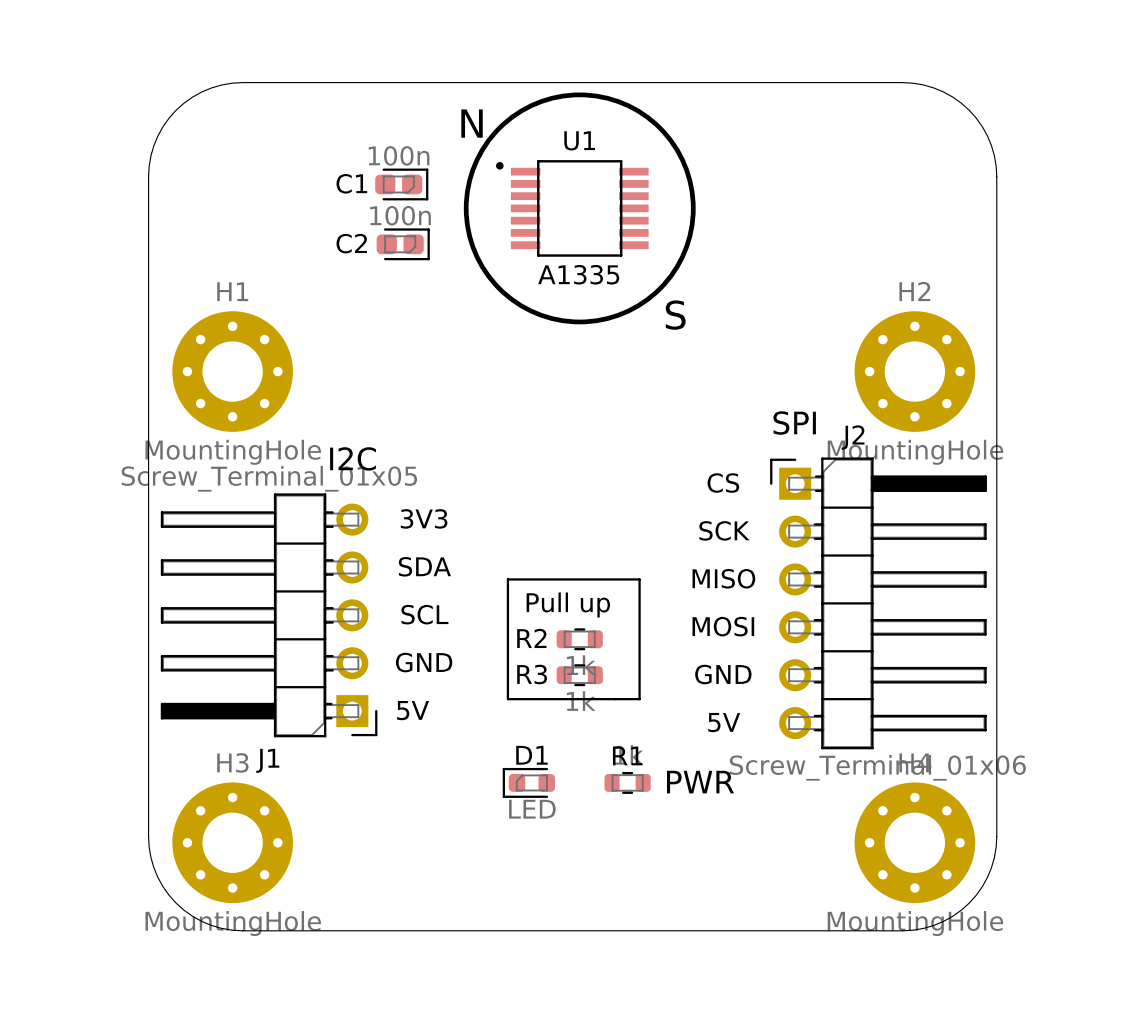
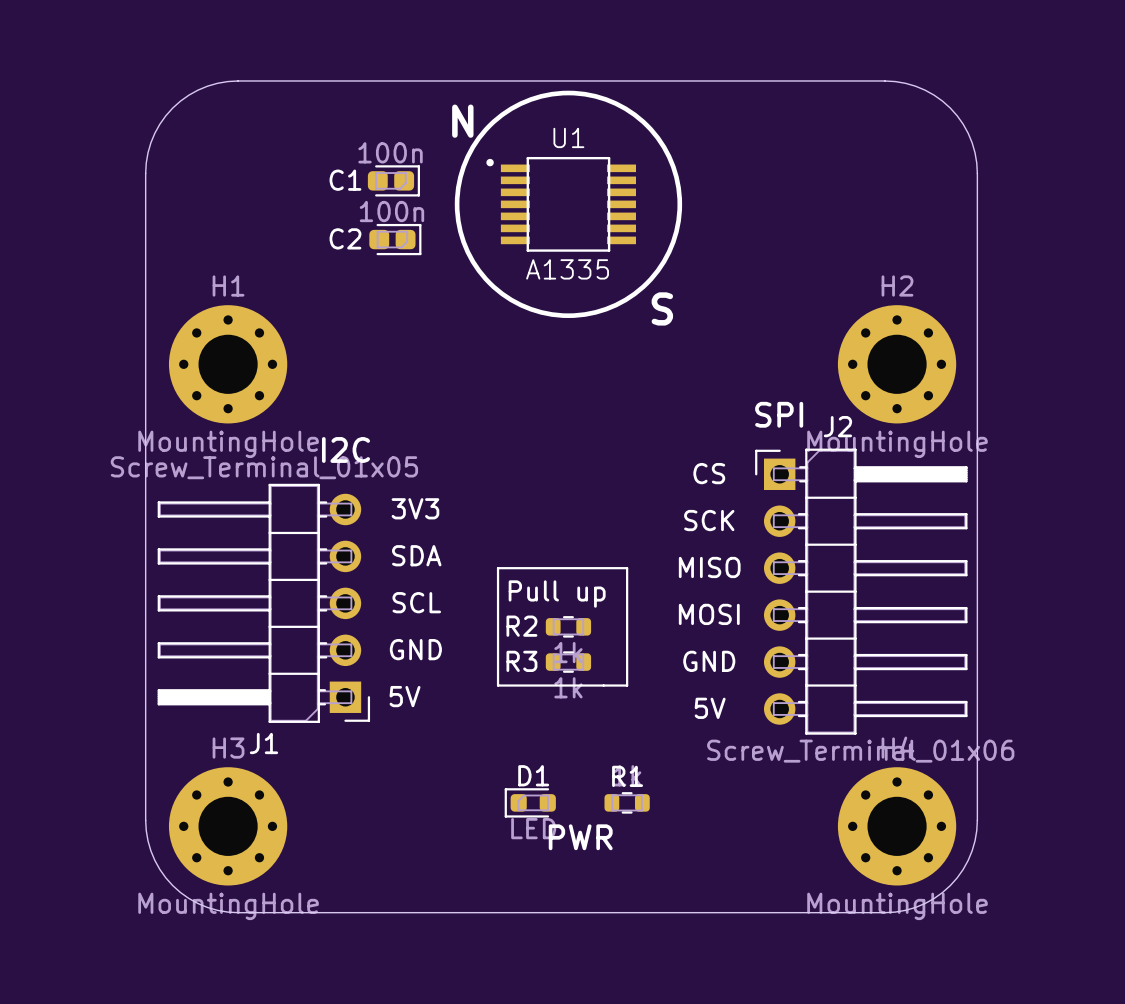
D1 position: (528, 782) -> (530, 802)
R1 position: (627, 782) -> (627, 802)
text position: PWR (700, 782) -> PWR (580, 837)

